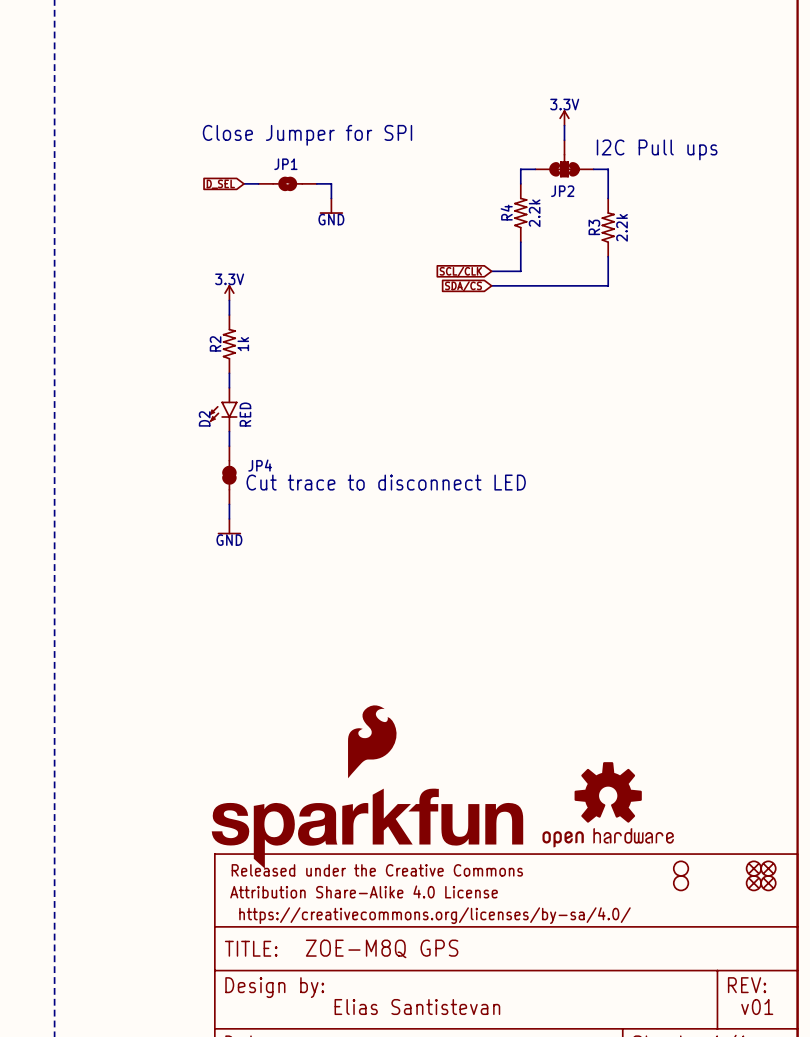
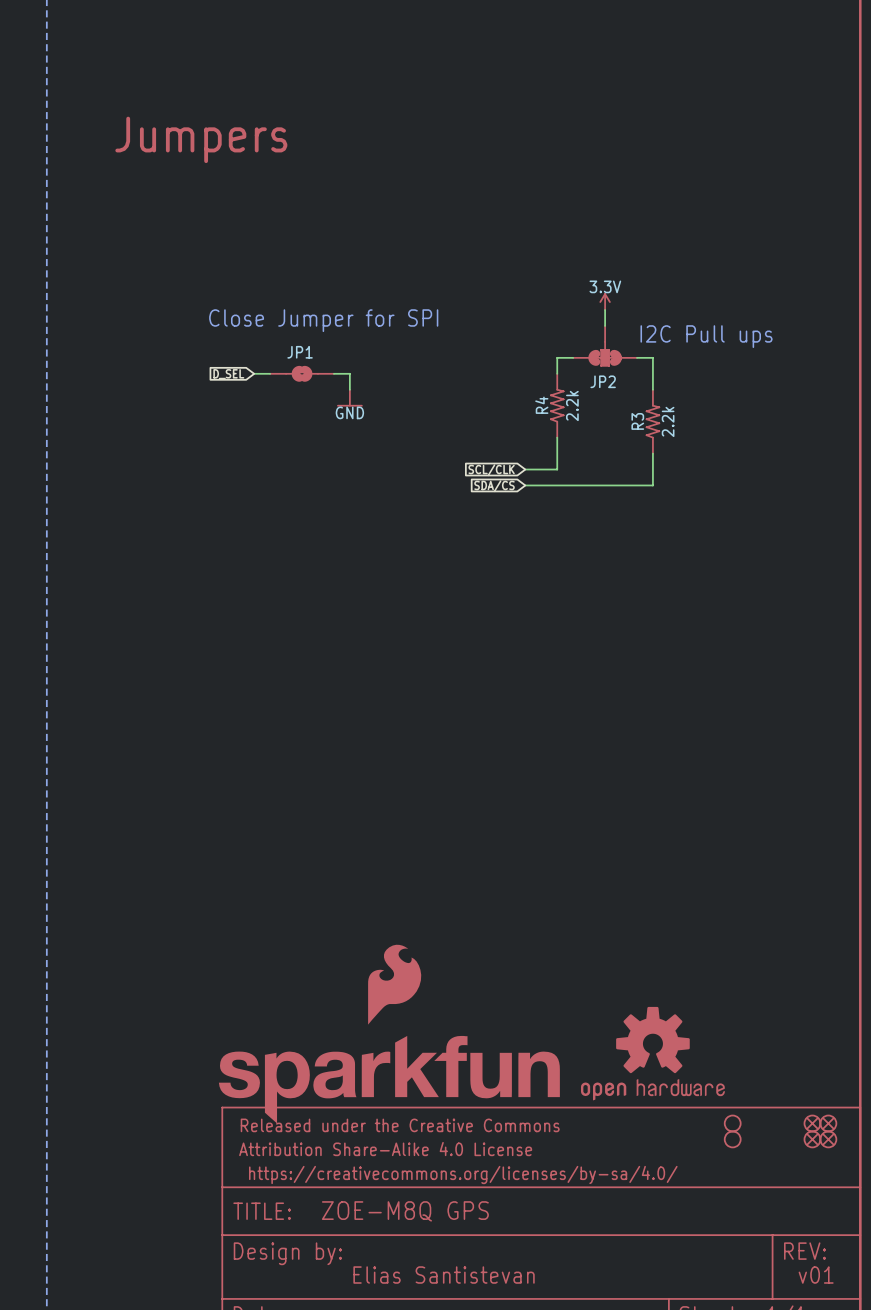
power symbol: 3.3V (229, 292) -> none
wire: (229, 300) (229, 315) -> none
R2: 1k (229, 344) -> none
wire: (229, 373) (229, 387) -> none
D2: RED (223, 409) -> none
wire: (229, 431) (229, 446) -> none
JP4: (229, 475) -> none
text: Cut trace to disconnect LED (386, 482) -> none
wire: (229, 504) (229, 518) -> none
power symbol: GND (229, 526) -> none

